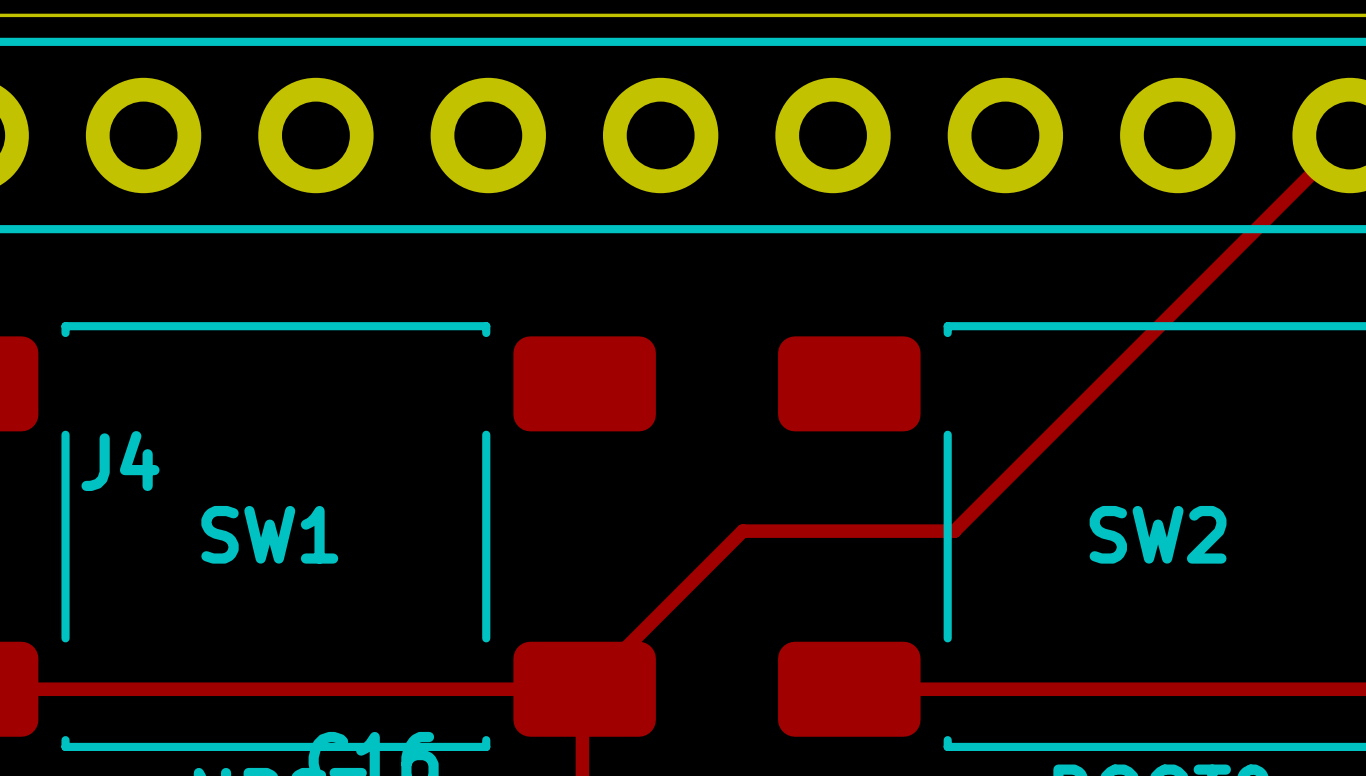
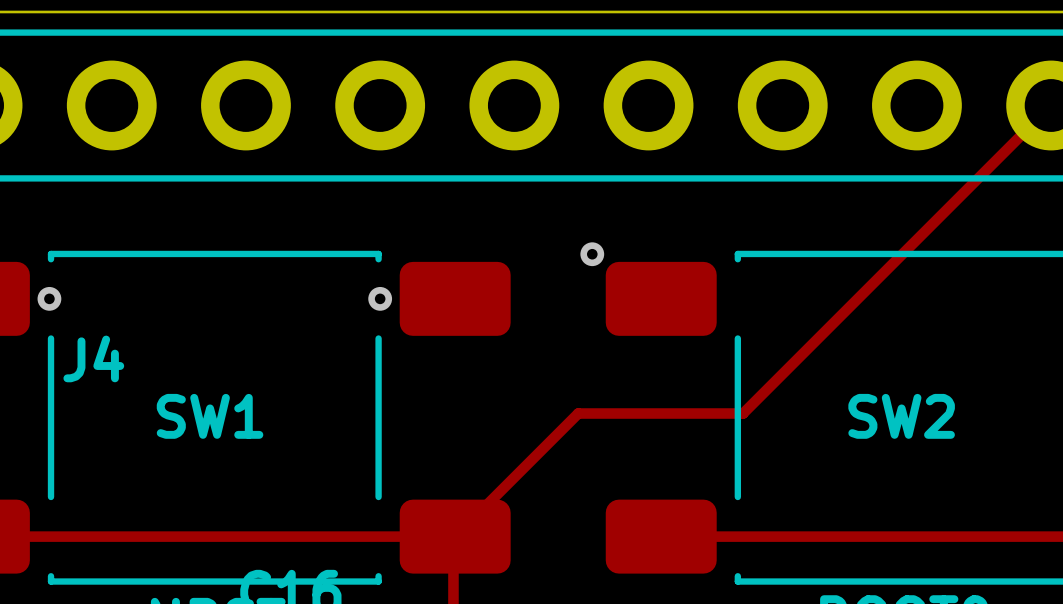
via: none -> (592, 254)
via: none -> (49, 298)
via: none -> (380, 298)

